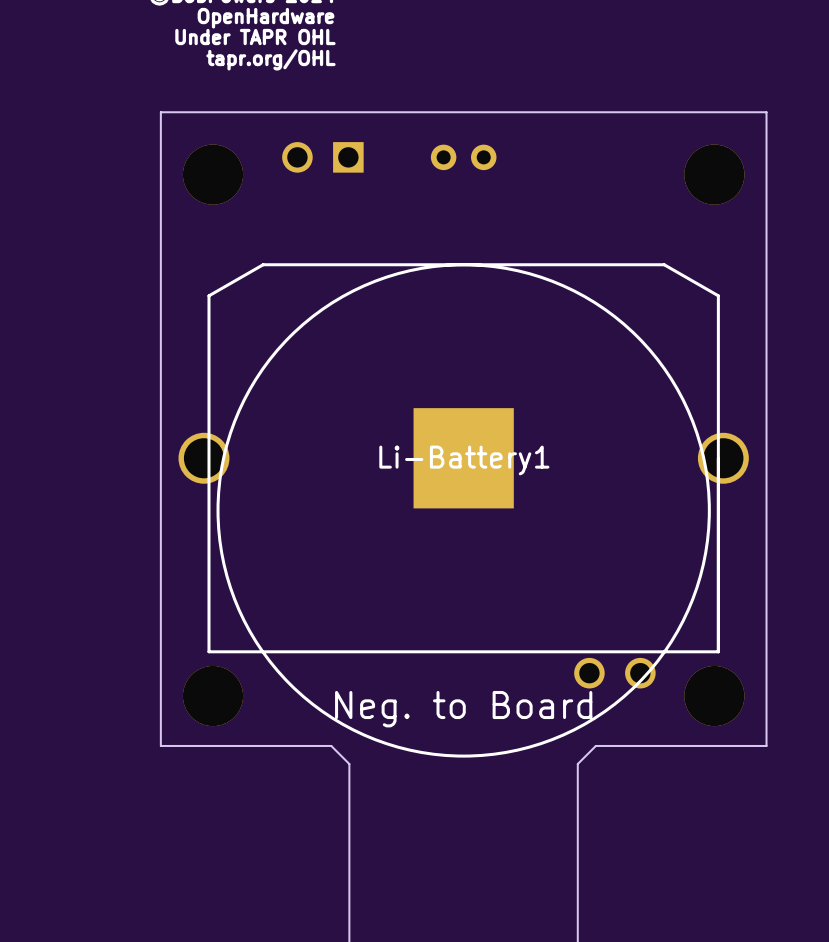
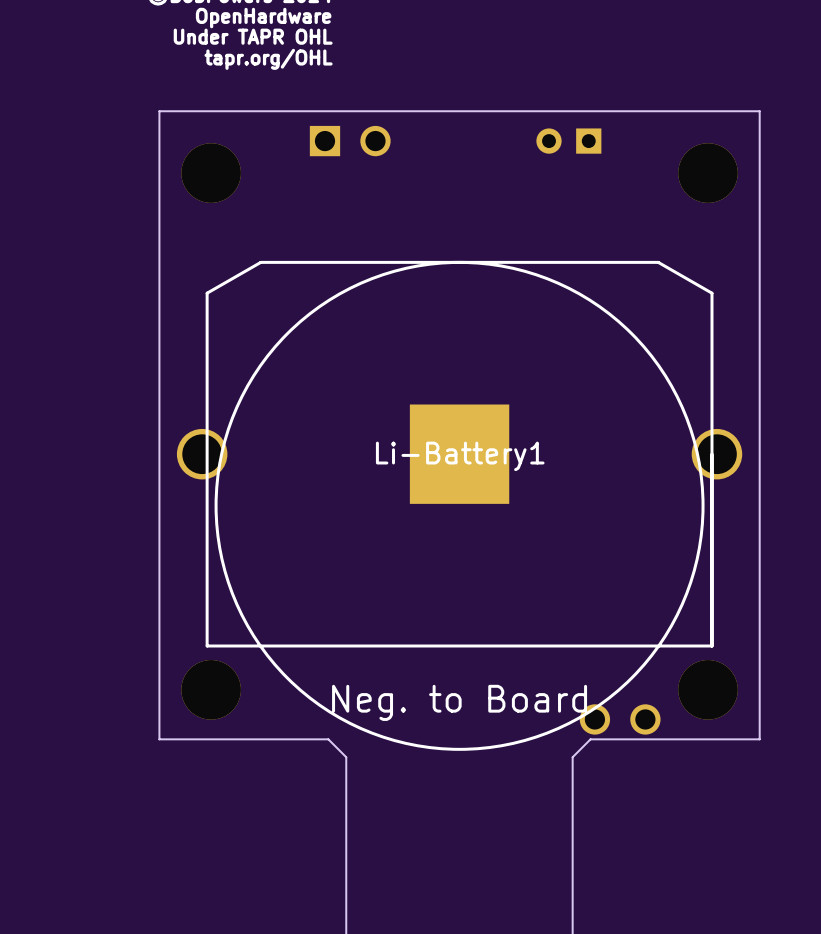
part: none -> (568, 141)
part rotation: 0° (322, 157) -> 180° (350, 141)
part: (463, 157) -> none
part position: (614, 673) -> (620, 719)

